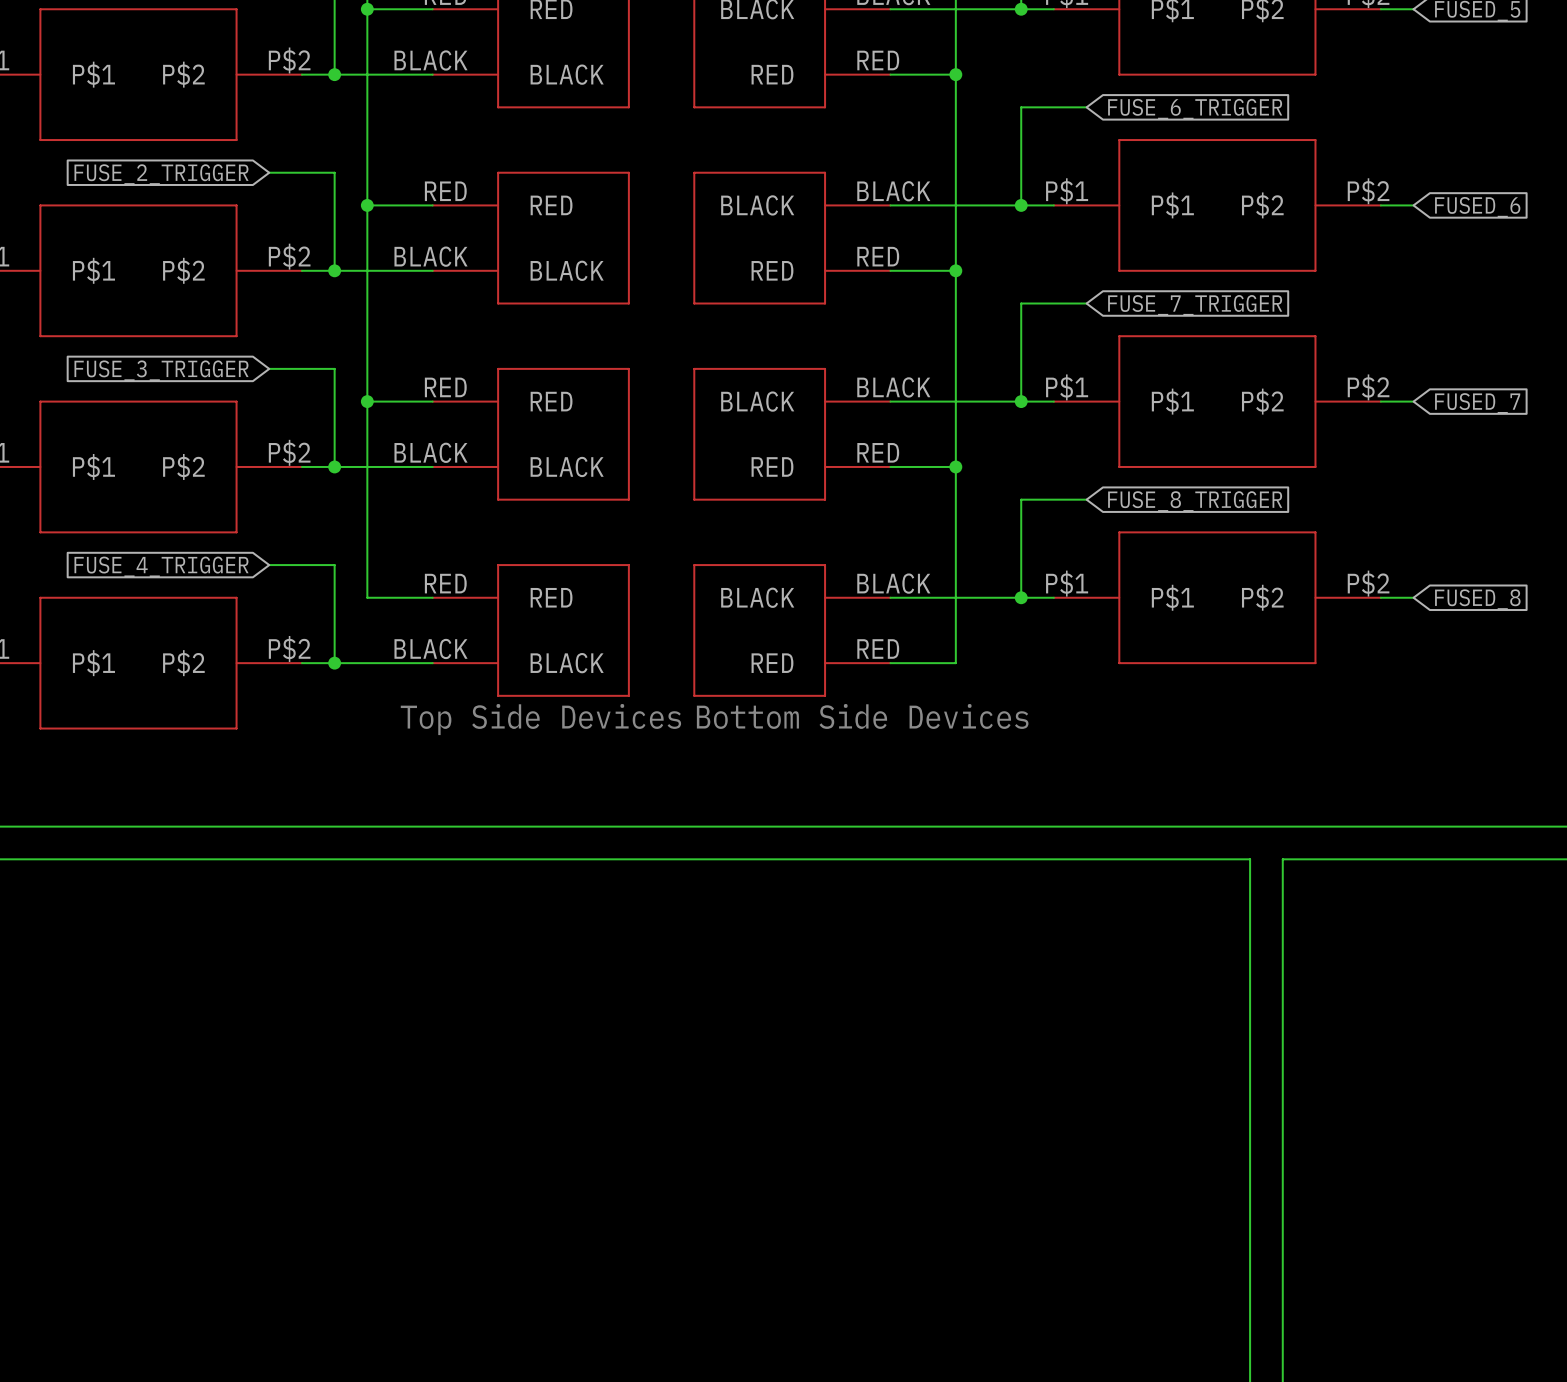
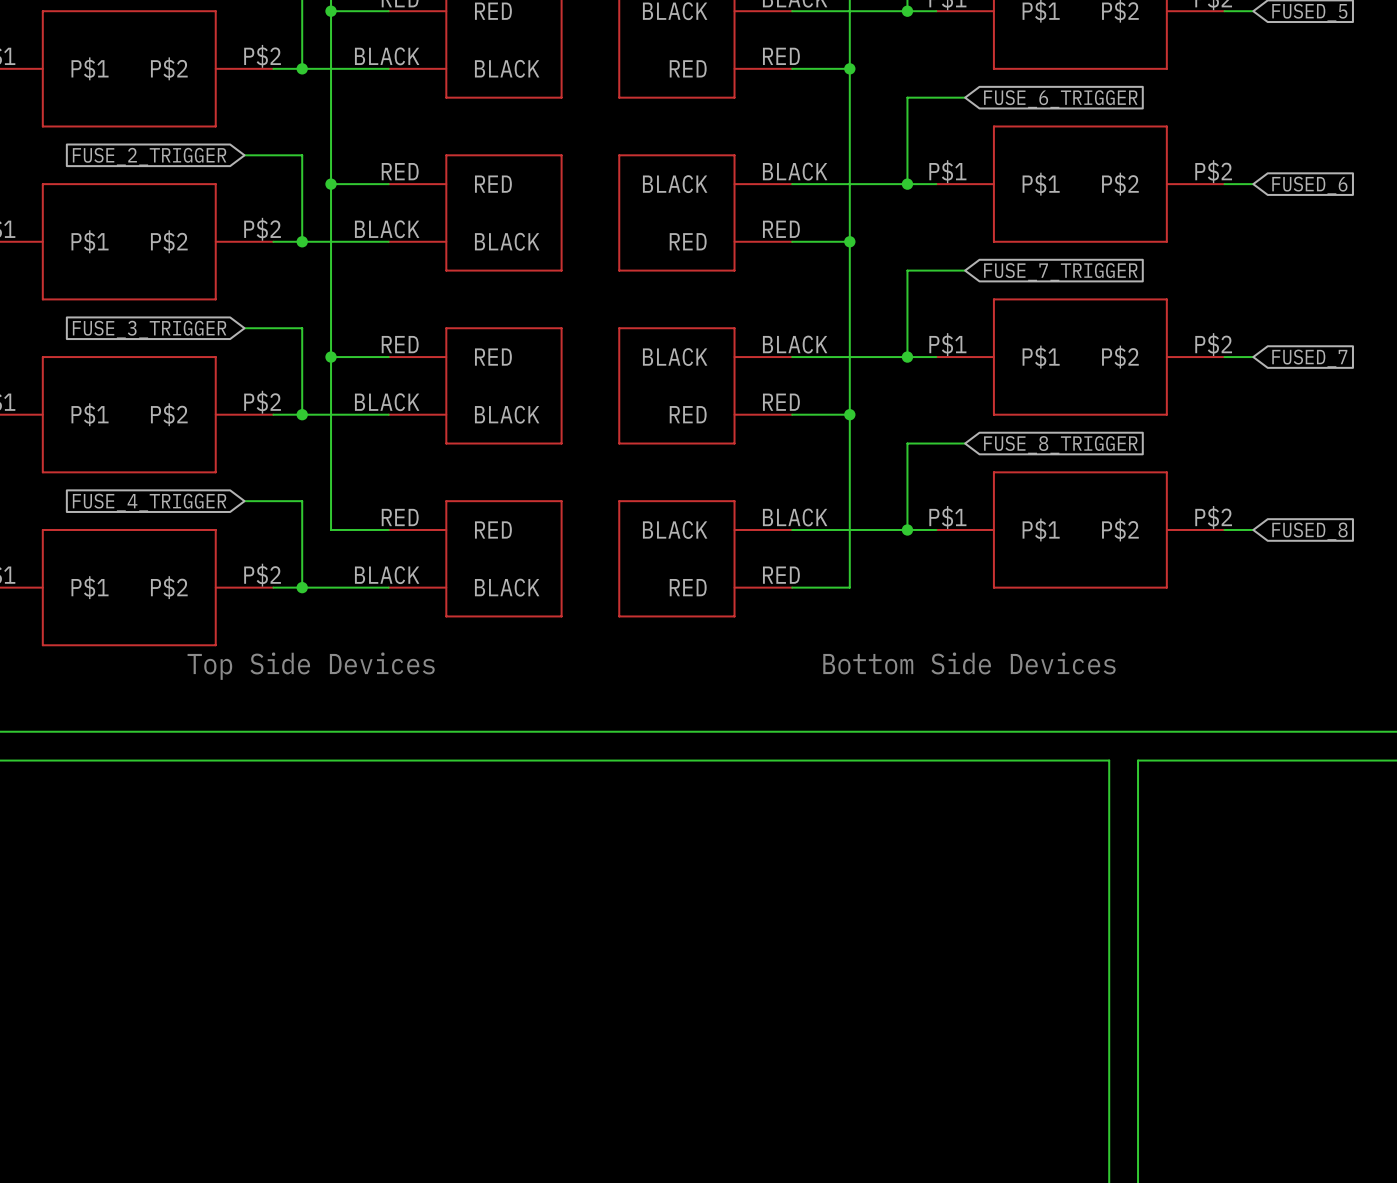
text position: Bottom Side Devices (862, 716) -> Bottom Side Devices (969, 663)
text position: Top Side Devices (540, 719) -> Top Side Devices (311, 666)

